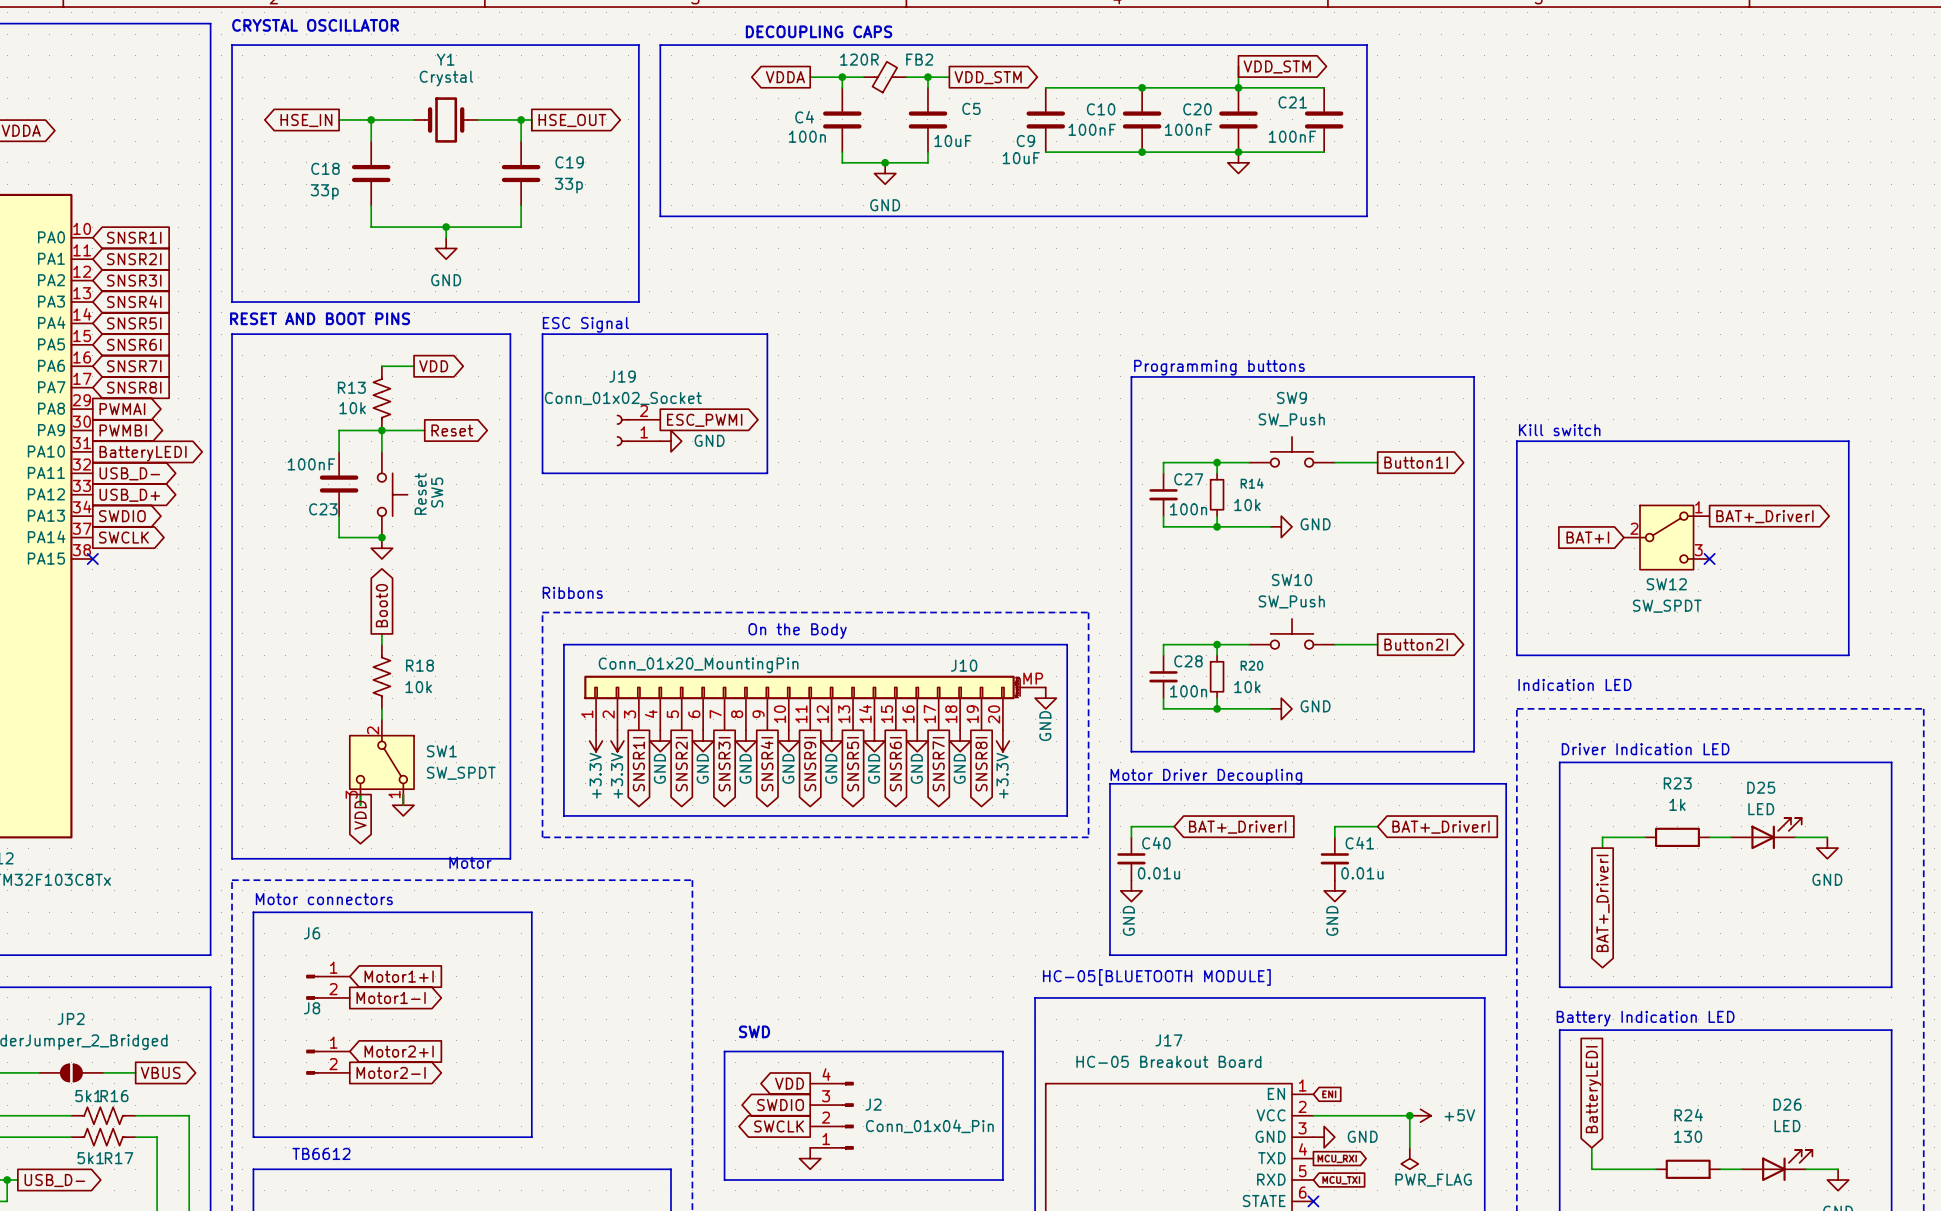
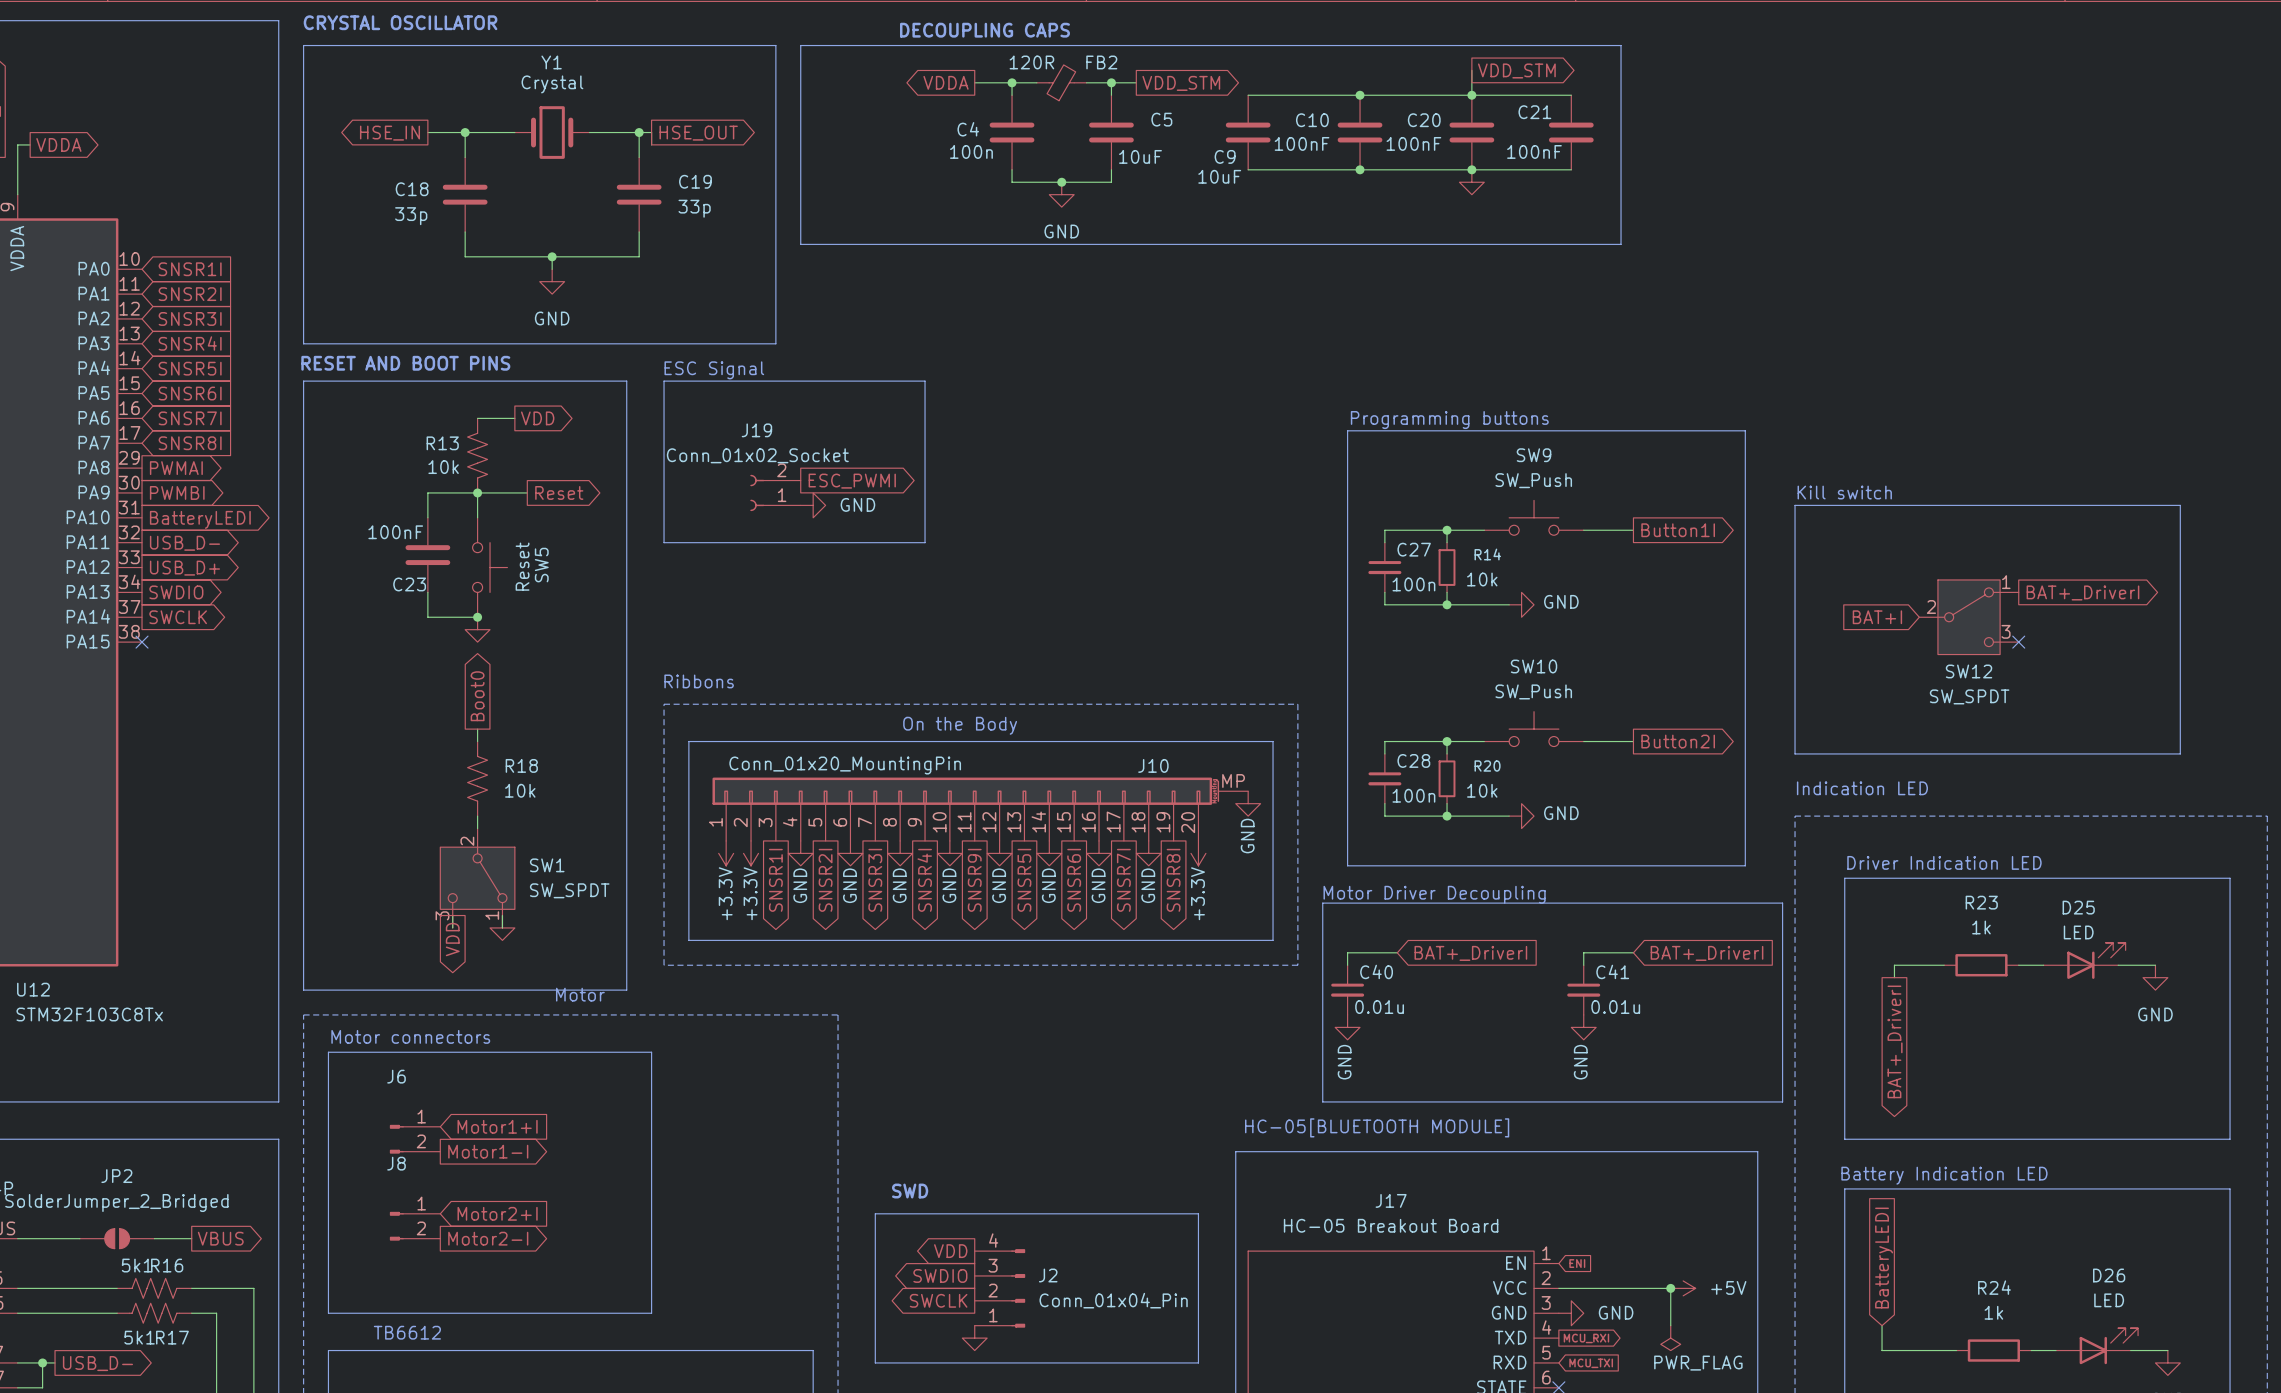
R24 value: 130 (1688, 1136) -> 1k (1993, 1312)

